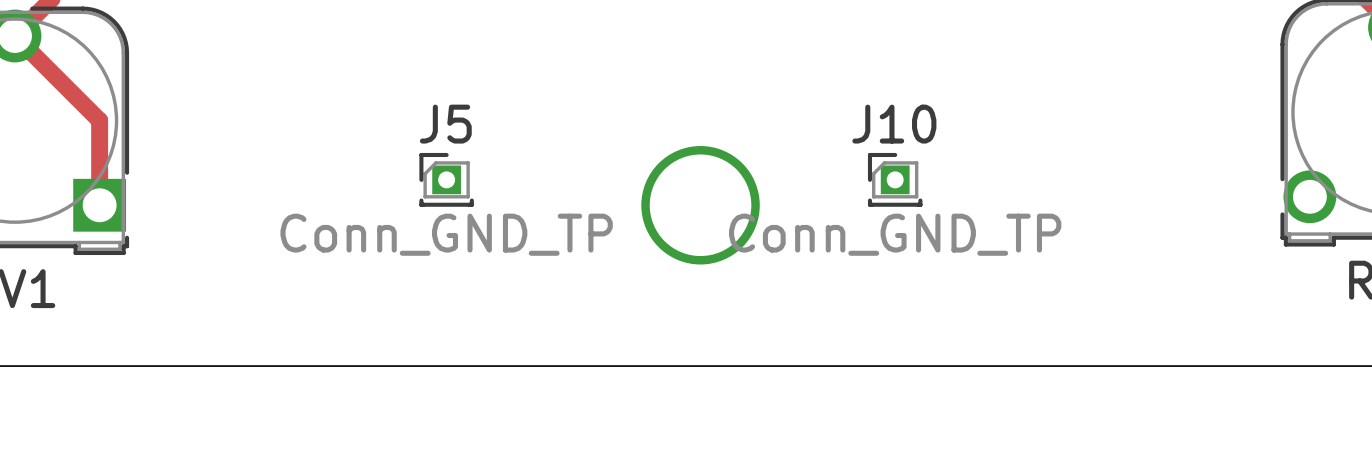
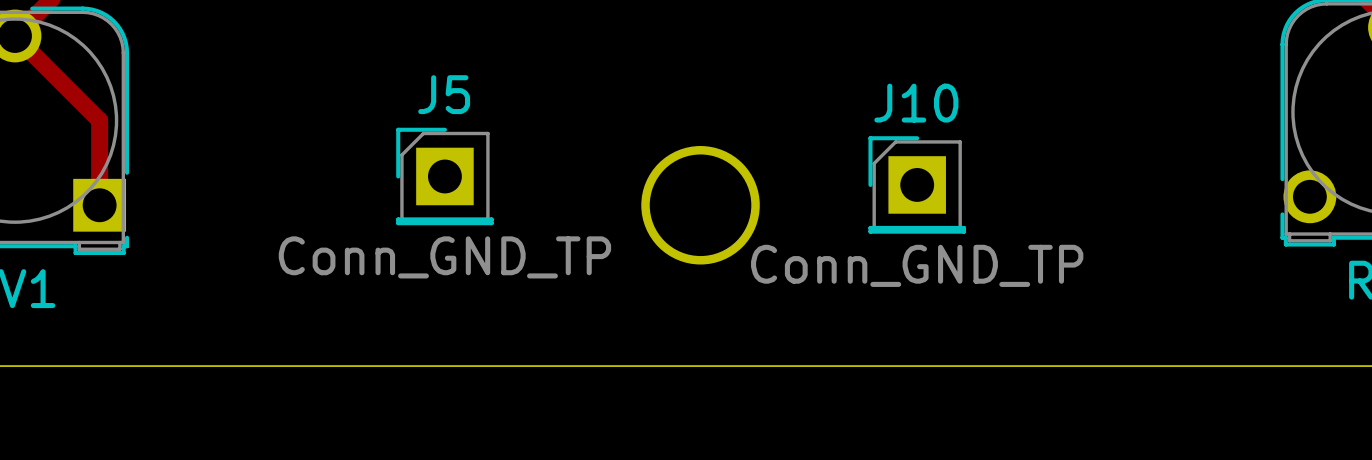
J5 footprint: [419, 152, 474, 207] -> [396, 127, 494, 226]
J10 footprint: [867, 152, 923, 207] -> [868, 136, 966, 234]

